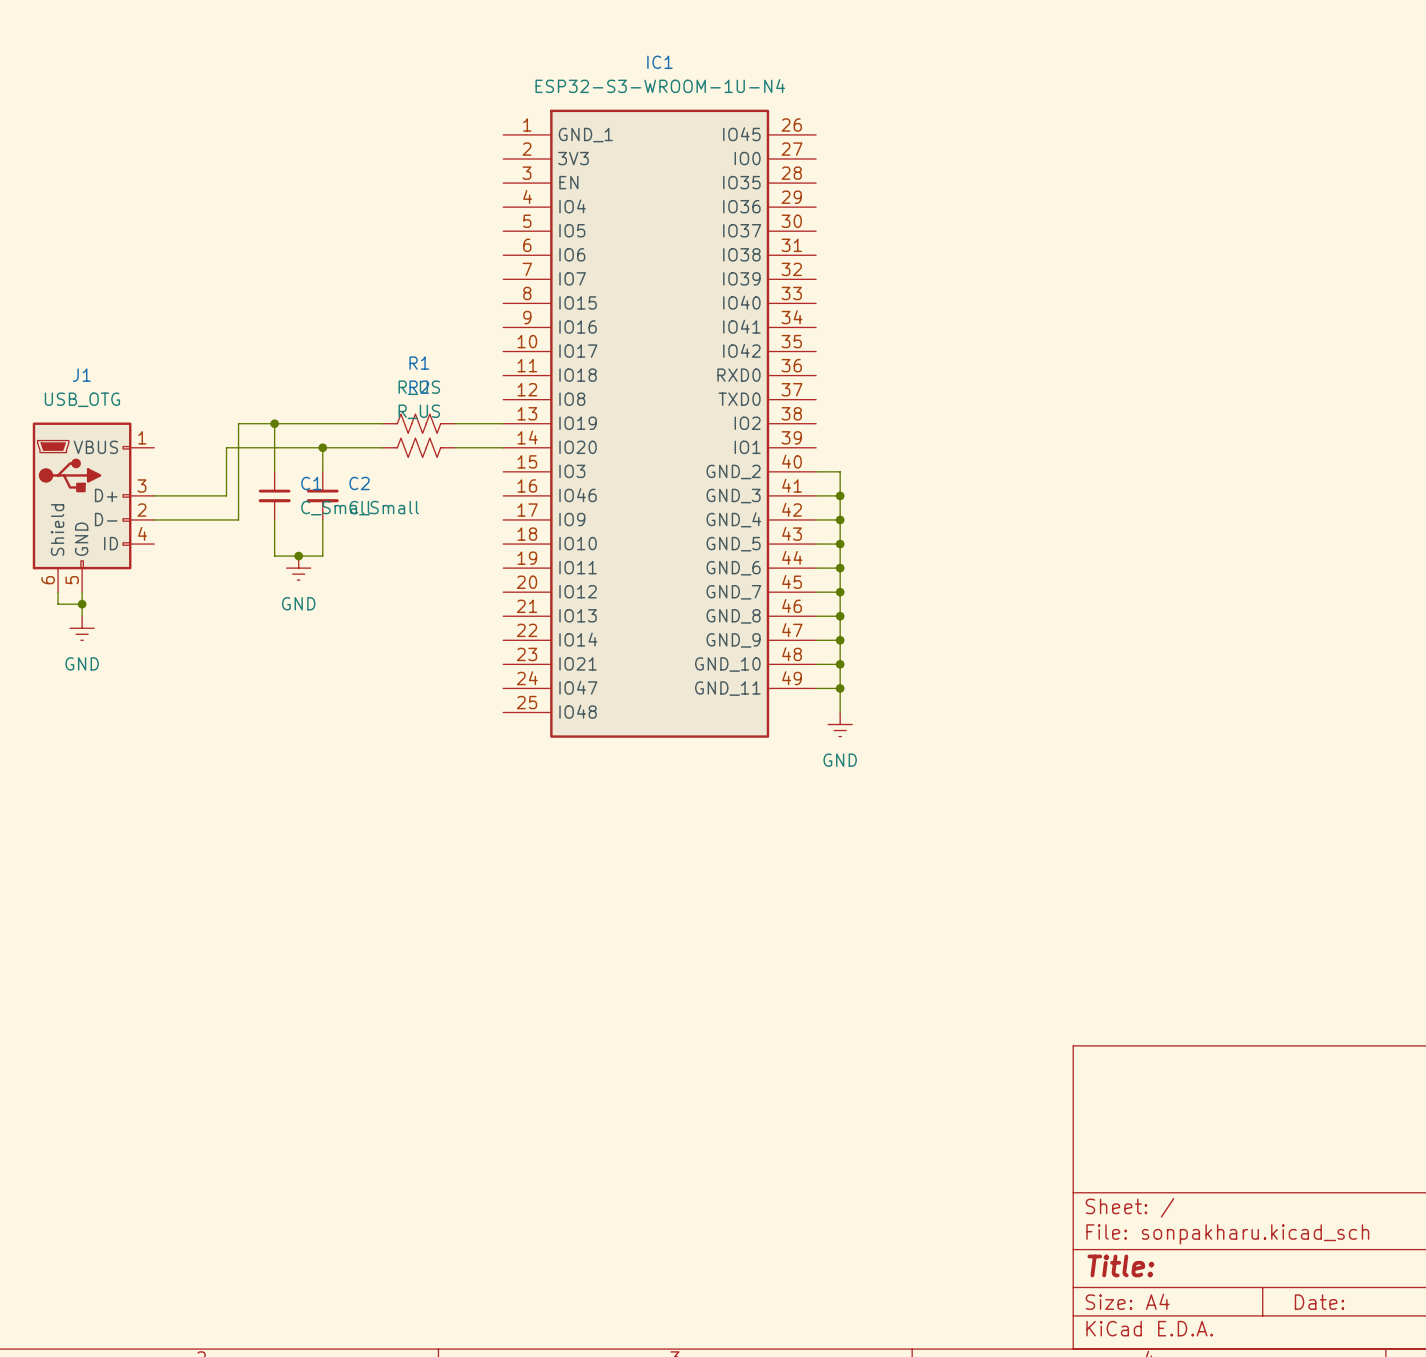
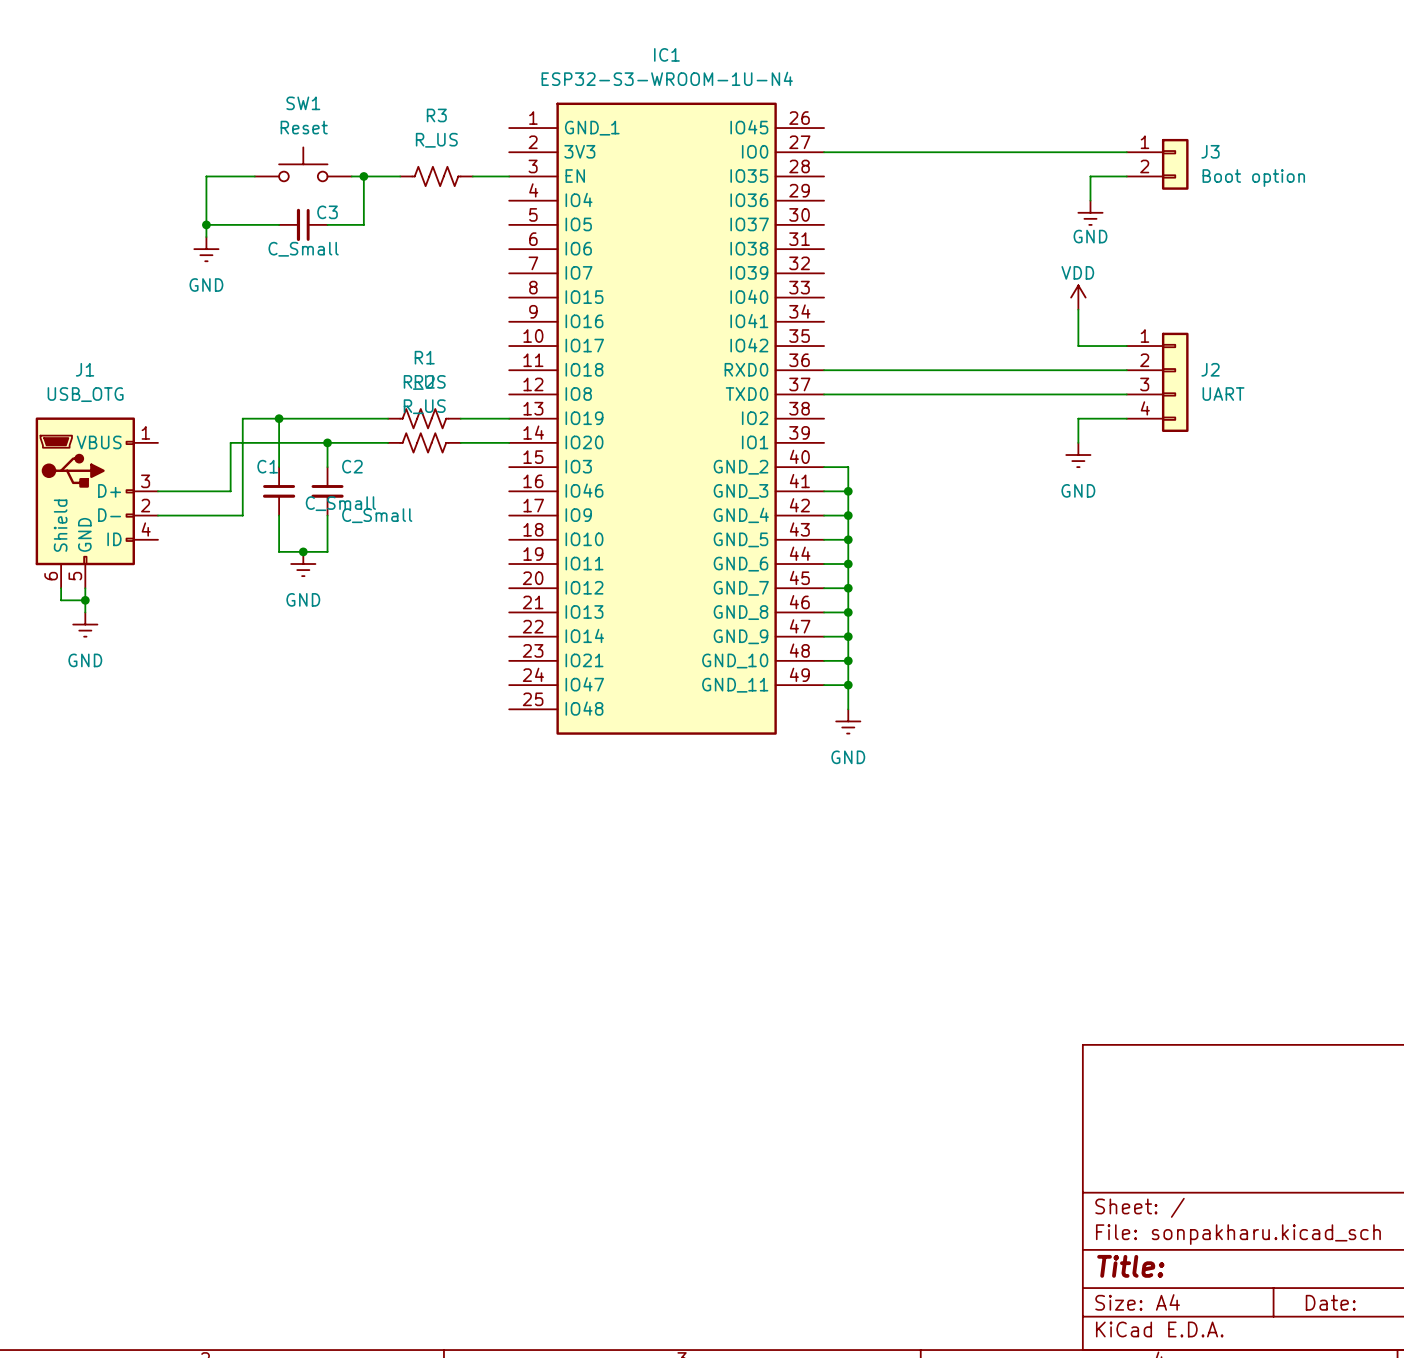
wire: none -> (824, 152) (1126, 152)
SW1: none -> Reset (303, 164)
J3: none -> Boot option (1157, 164)
wire: none -> (254, 176) (206, 176) (206, 237)
wire: none -> (351, 176) (400, 176)
wire: none -> (363, 176) (363, 224) (327, 224)
junction: none -> (363, 176)
R3: none -> R_US (436, 176)
wire: none -> (472, 176) (509, 176)
wire: none -> (1126, 176) (1090, 176) (1090, 200)
power symbol: none -> GND (1090, 212)
wire: none -> (206, 224) (279, 224)
junction: none -> (206, 224)
C3: none -> C_Small (303, 224)
power symbol: none -> GND (206, 249)
power symbol: none -> VDD (1078, 297)
wire: none -> (1078, 309) (1078, 346) (1126, 346)
wire: none -> (824, 370) (1126, 370)
J2: none -> UART (1157, 382)
wire: none -> (824, 394) (1126, 394)
wire: none -> (1126, 418) (1078, 418) (1078, 442)
power symbol: none -> GND (1078, 455)
C1 name position: C1 (311, 483) -> C1 (267, 466)
C2 name position: C2 (359, 483) -> C2 (352, 466)
C2 value position: C_Small (384, 508) -> C_Small (377, 515)

